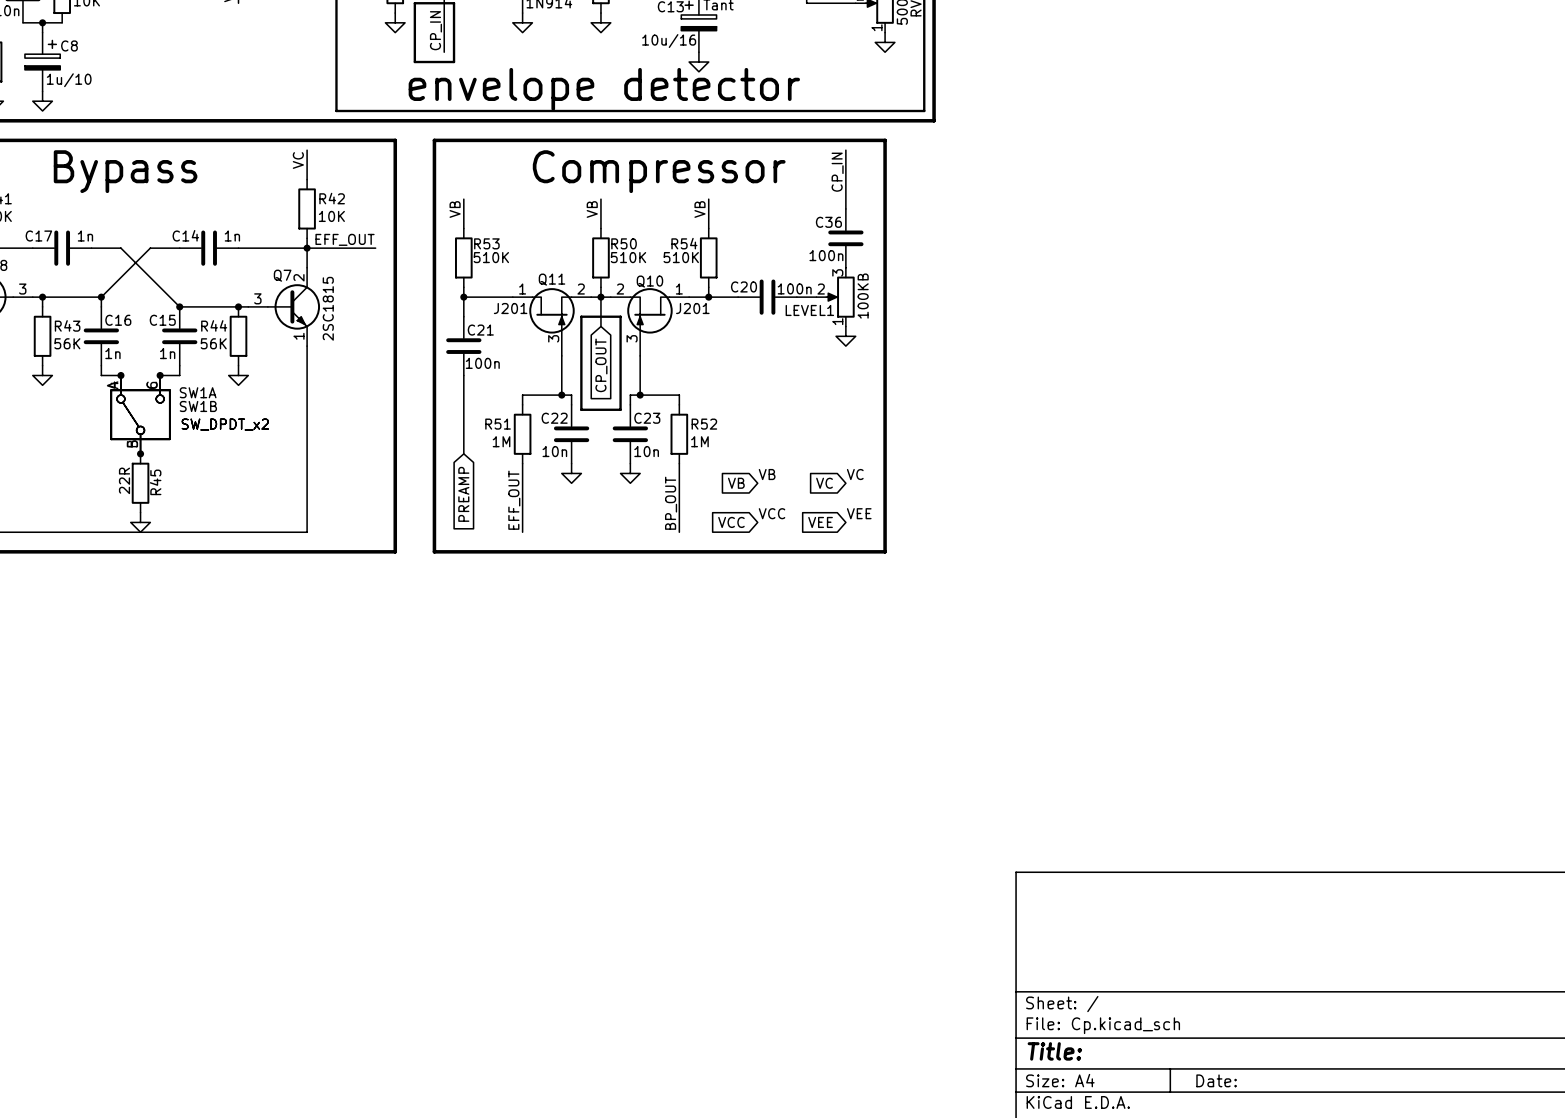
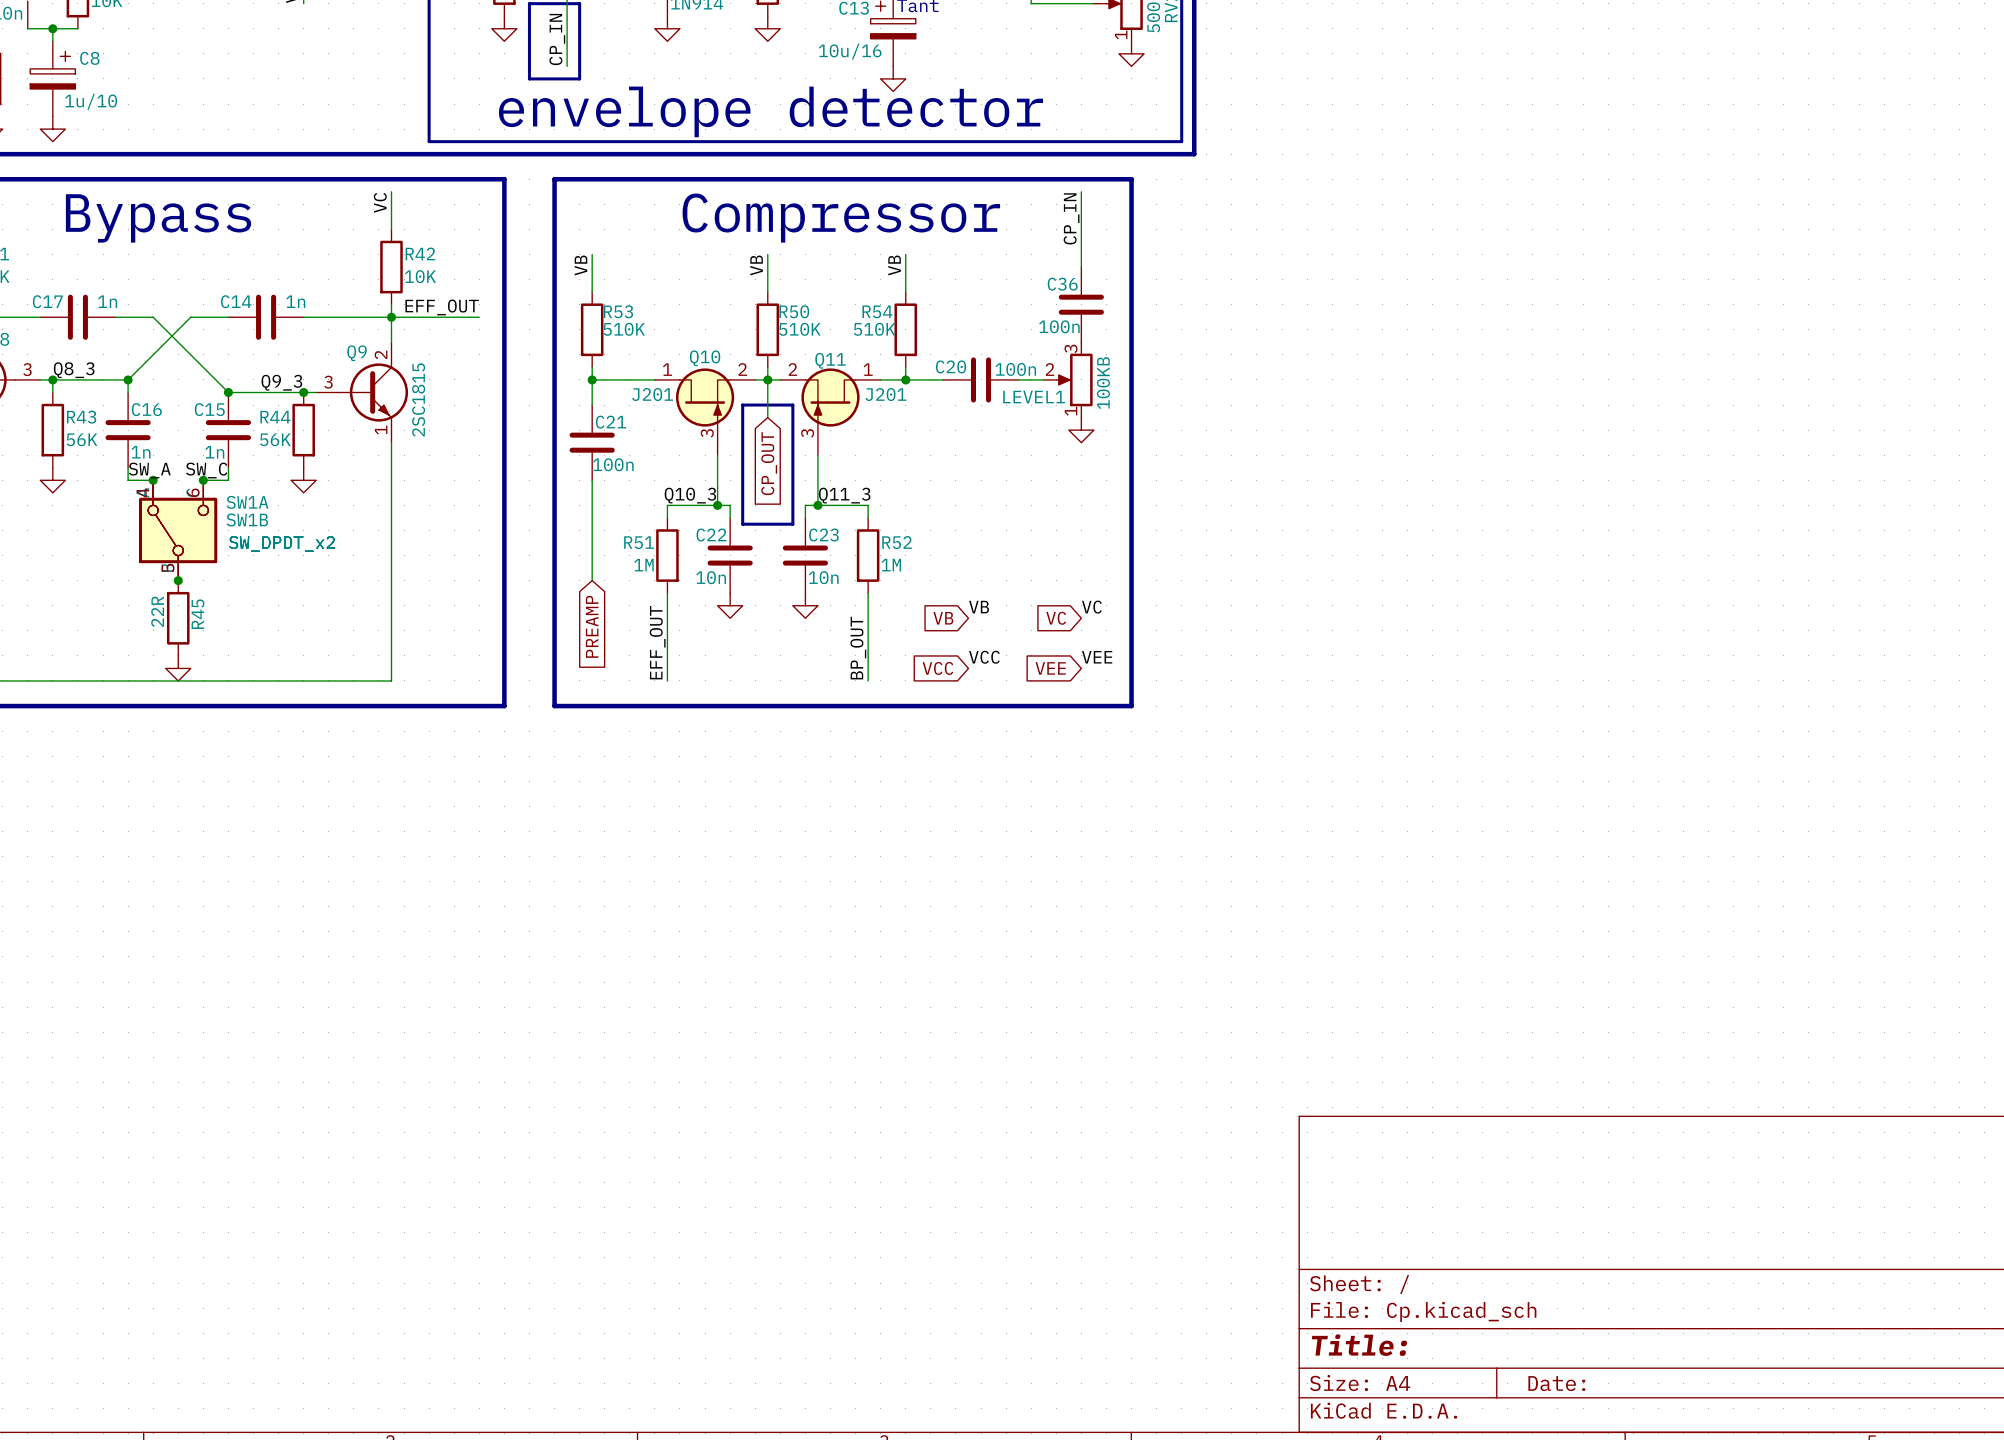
Q7 name: Q7 (282, 275) -> Q9 (357, 353)
Q11 name: Q11 (551, 279) -> Q10 (705, 358)
Q10 name: Q10 (649, 281) -> Q11 (830, 360)
label: none -> Q8_3 (74, 370)
label: none -> Q9_3 (281, 382)
label: none -> SW_A (149, 470)
label: none -> SW_C (206, 470)
label: none -> Q10_3 (690, 495)
label: none -> Q11_3 (844, 495)

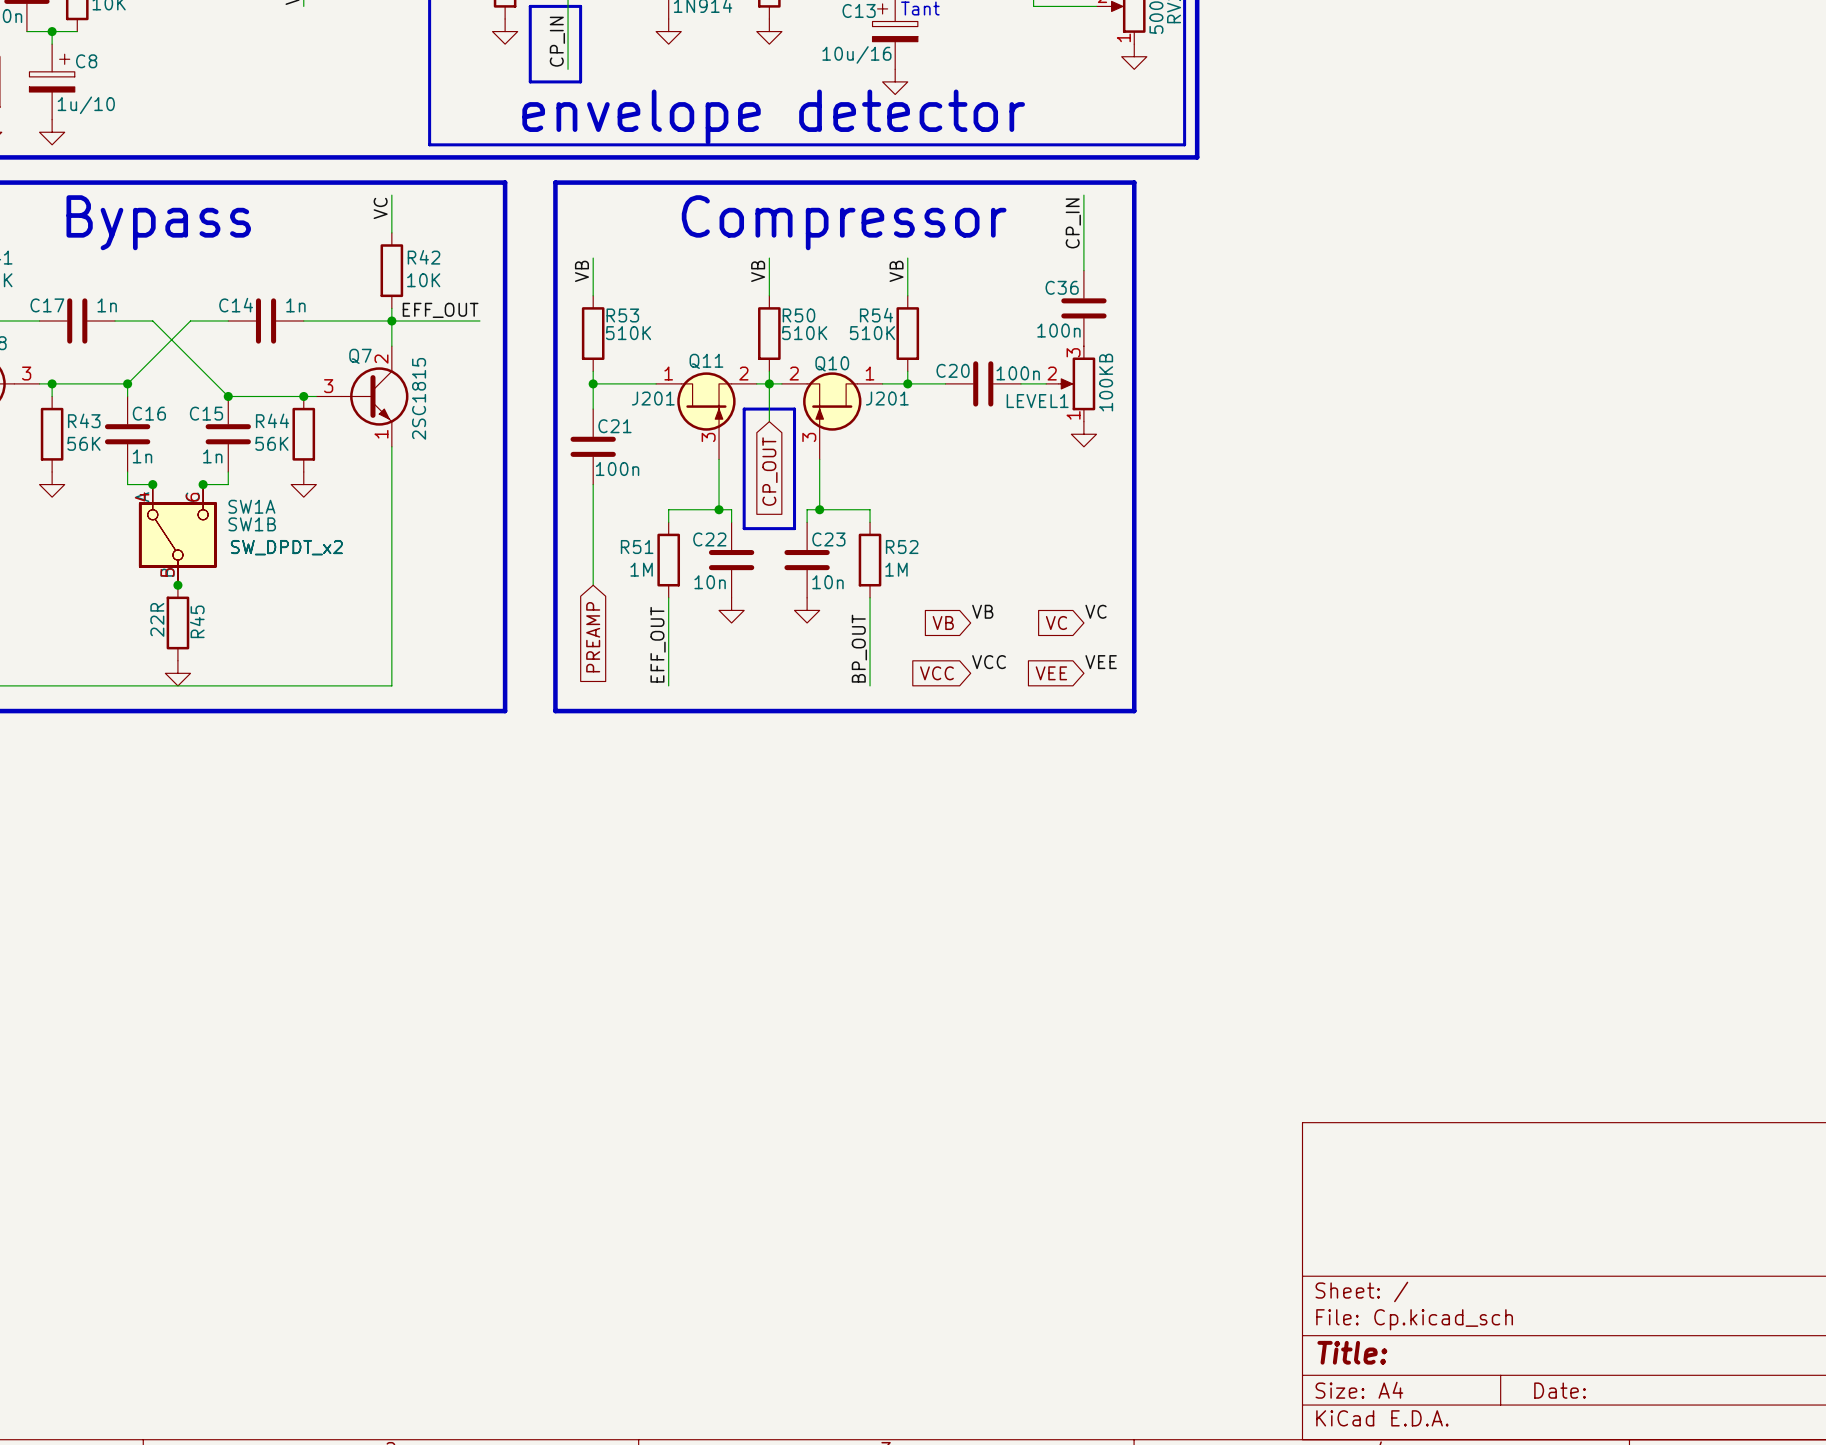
Q9 name: Q9 (357, 353) -> Q7 (360, 356)
Q10 name: Q10 (705, 358) -> Q11 (706, 361)
Q11 name: Q11 (830, 360) -> Q10 (832, 363)
label: Q8_3 (74, 370) -> none
label: Q9_3 (281, 382) -> none
label: SW_A (149, 470) -> none
label: SW_C (206, 470) -> none
label: Q10_3 (690, 495) -> none
label: Q11_3 (844, 495) -> none

